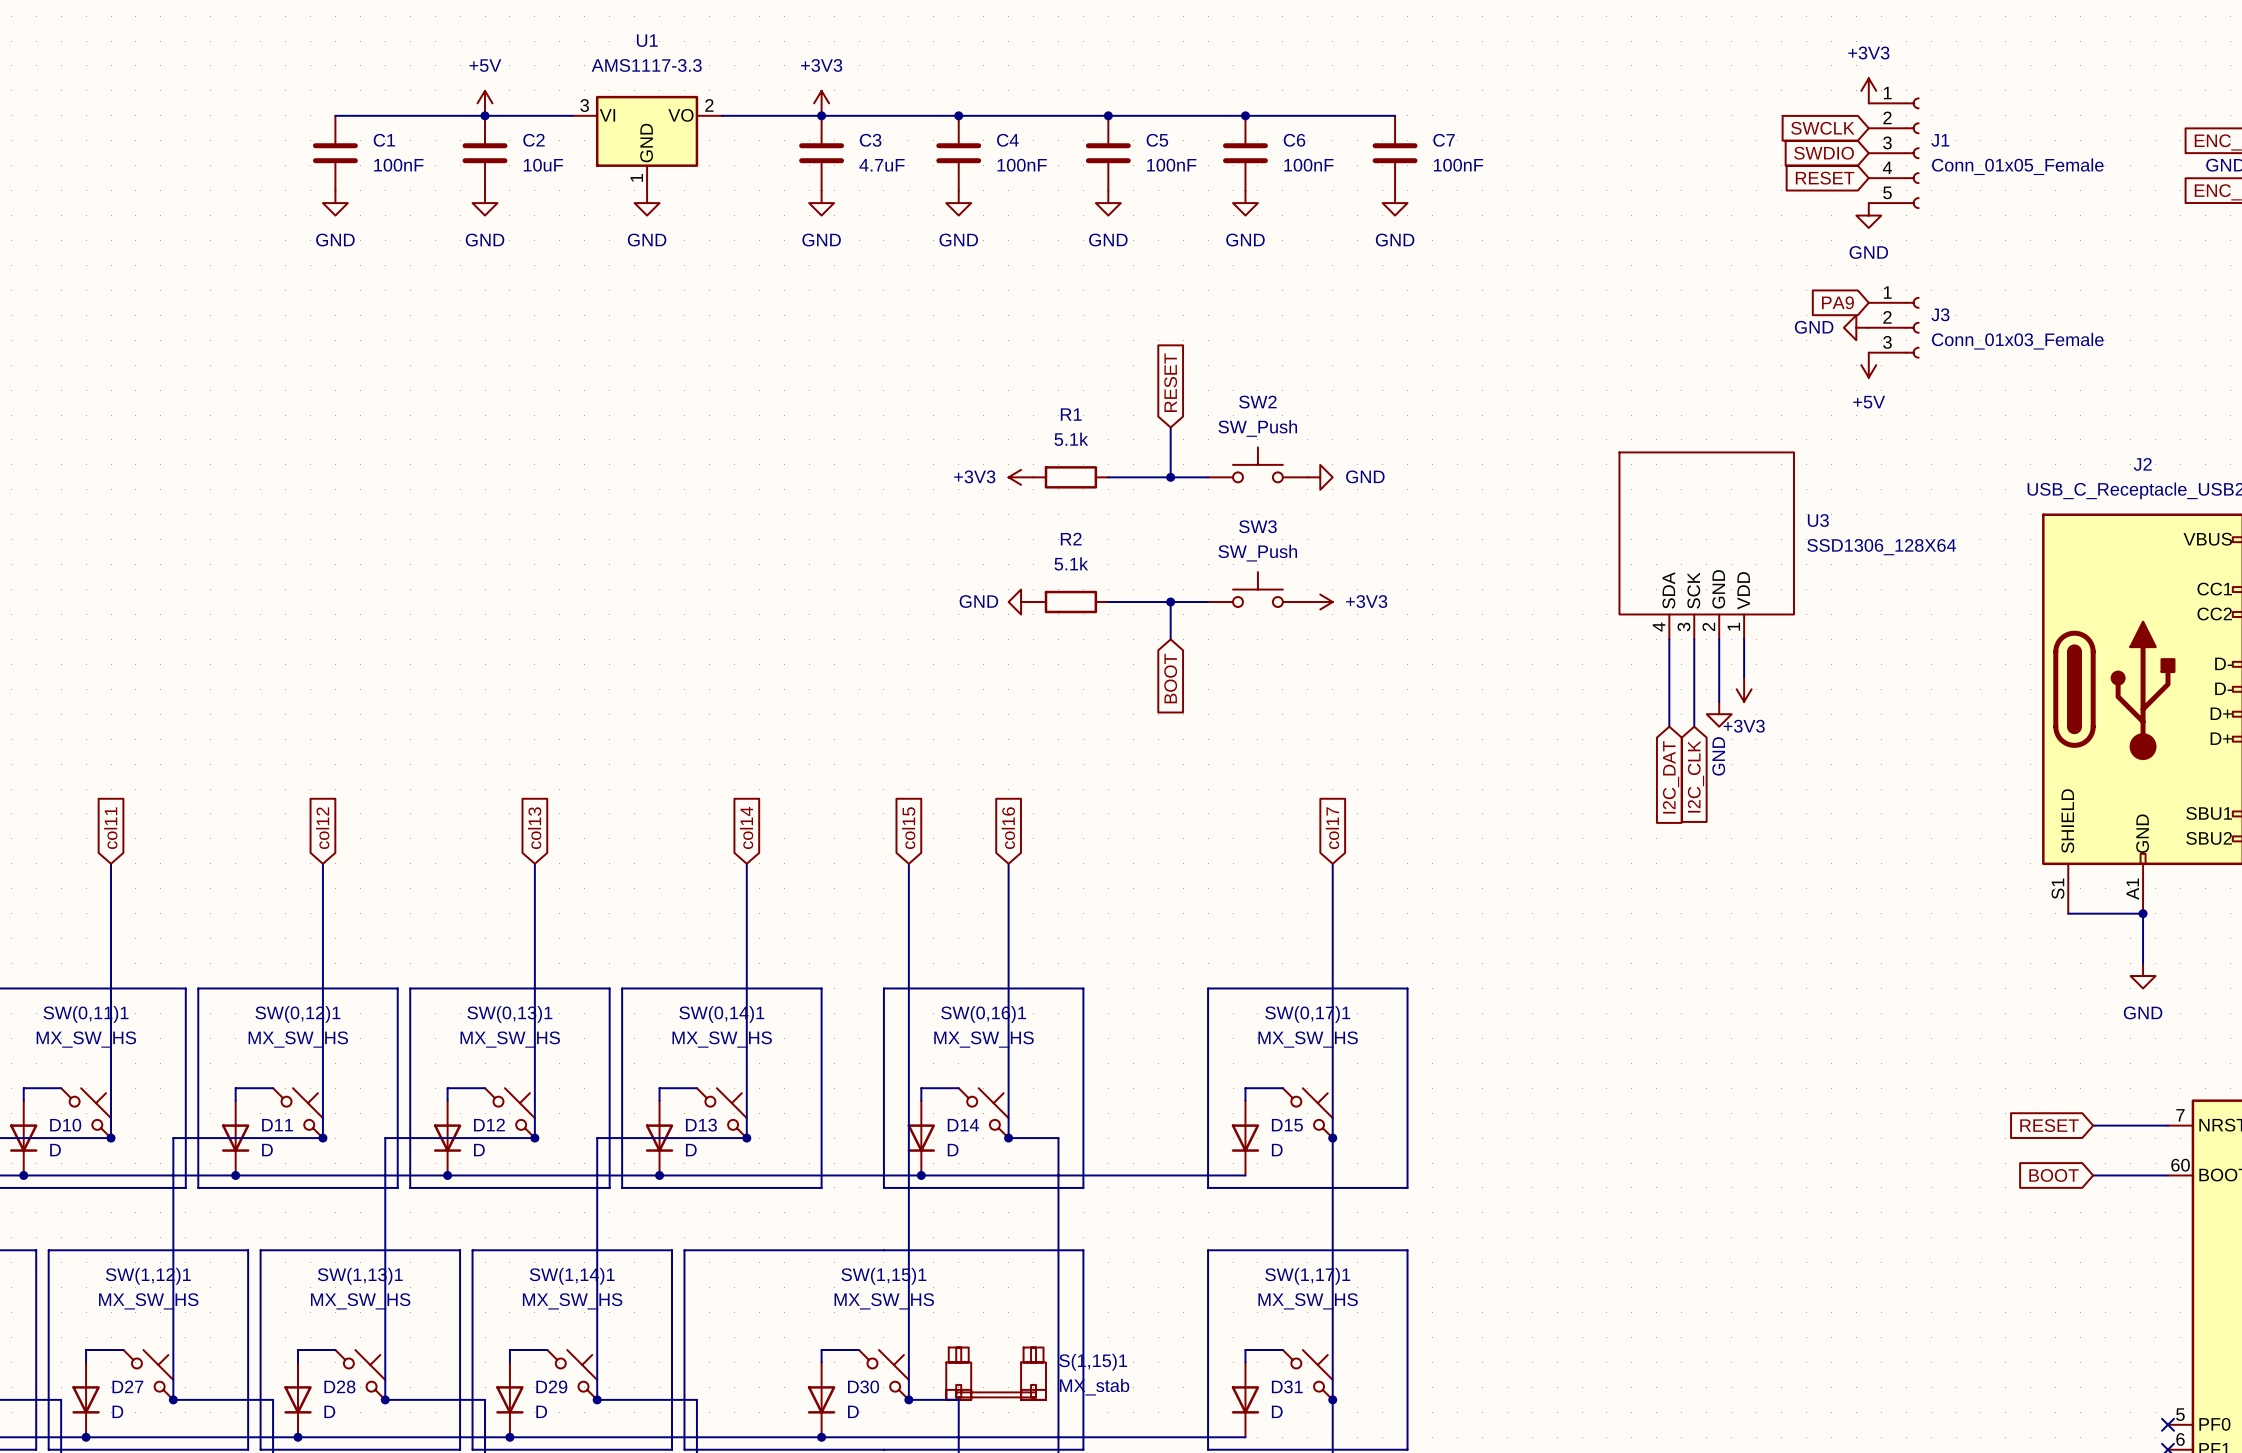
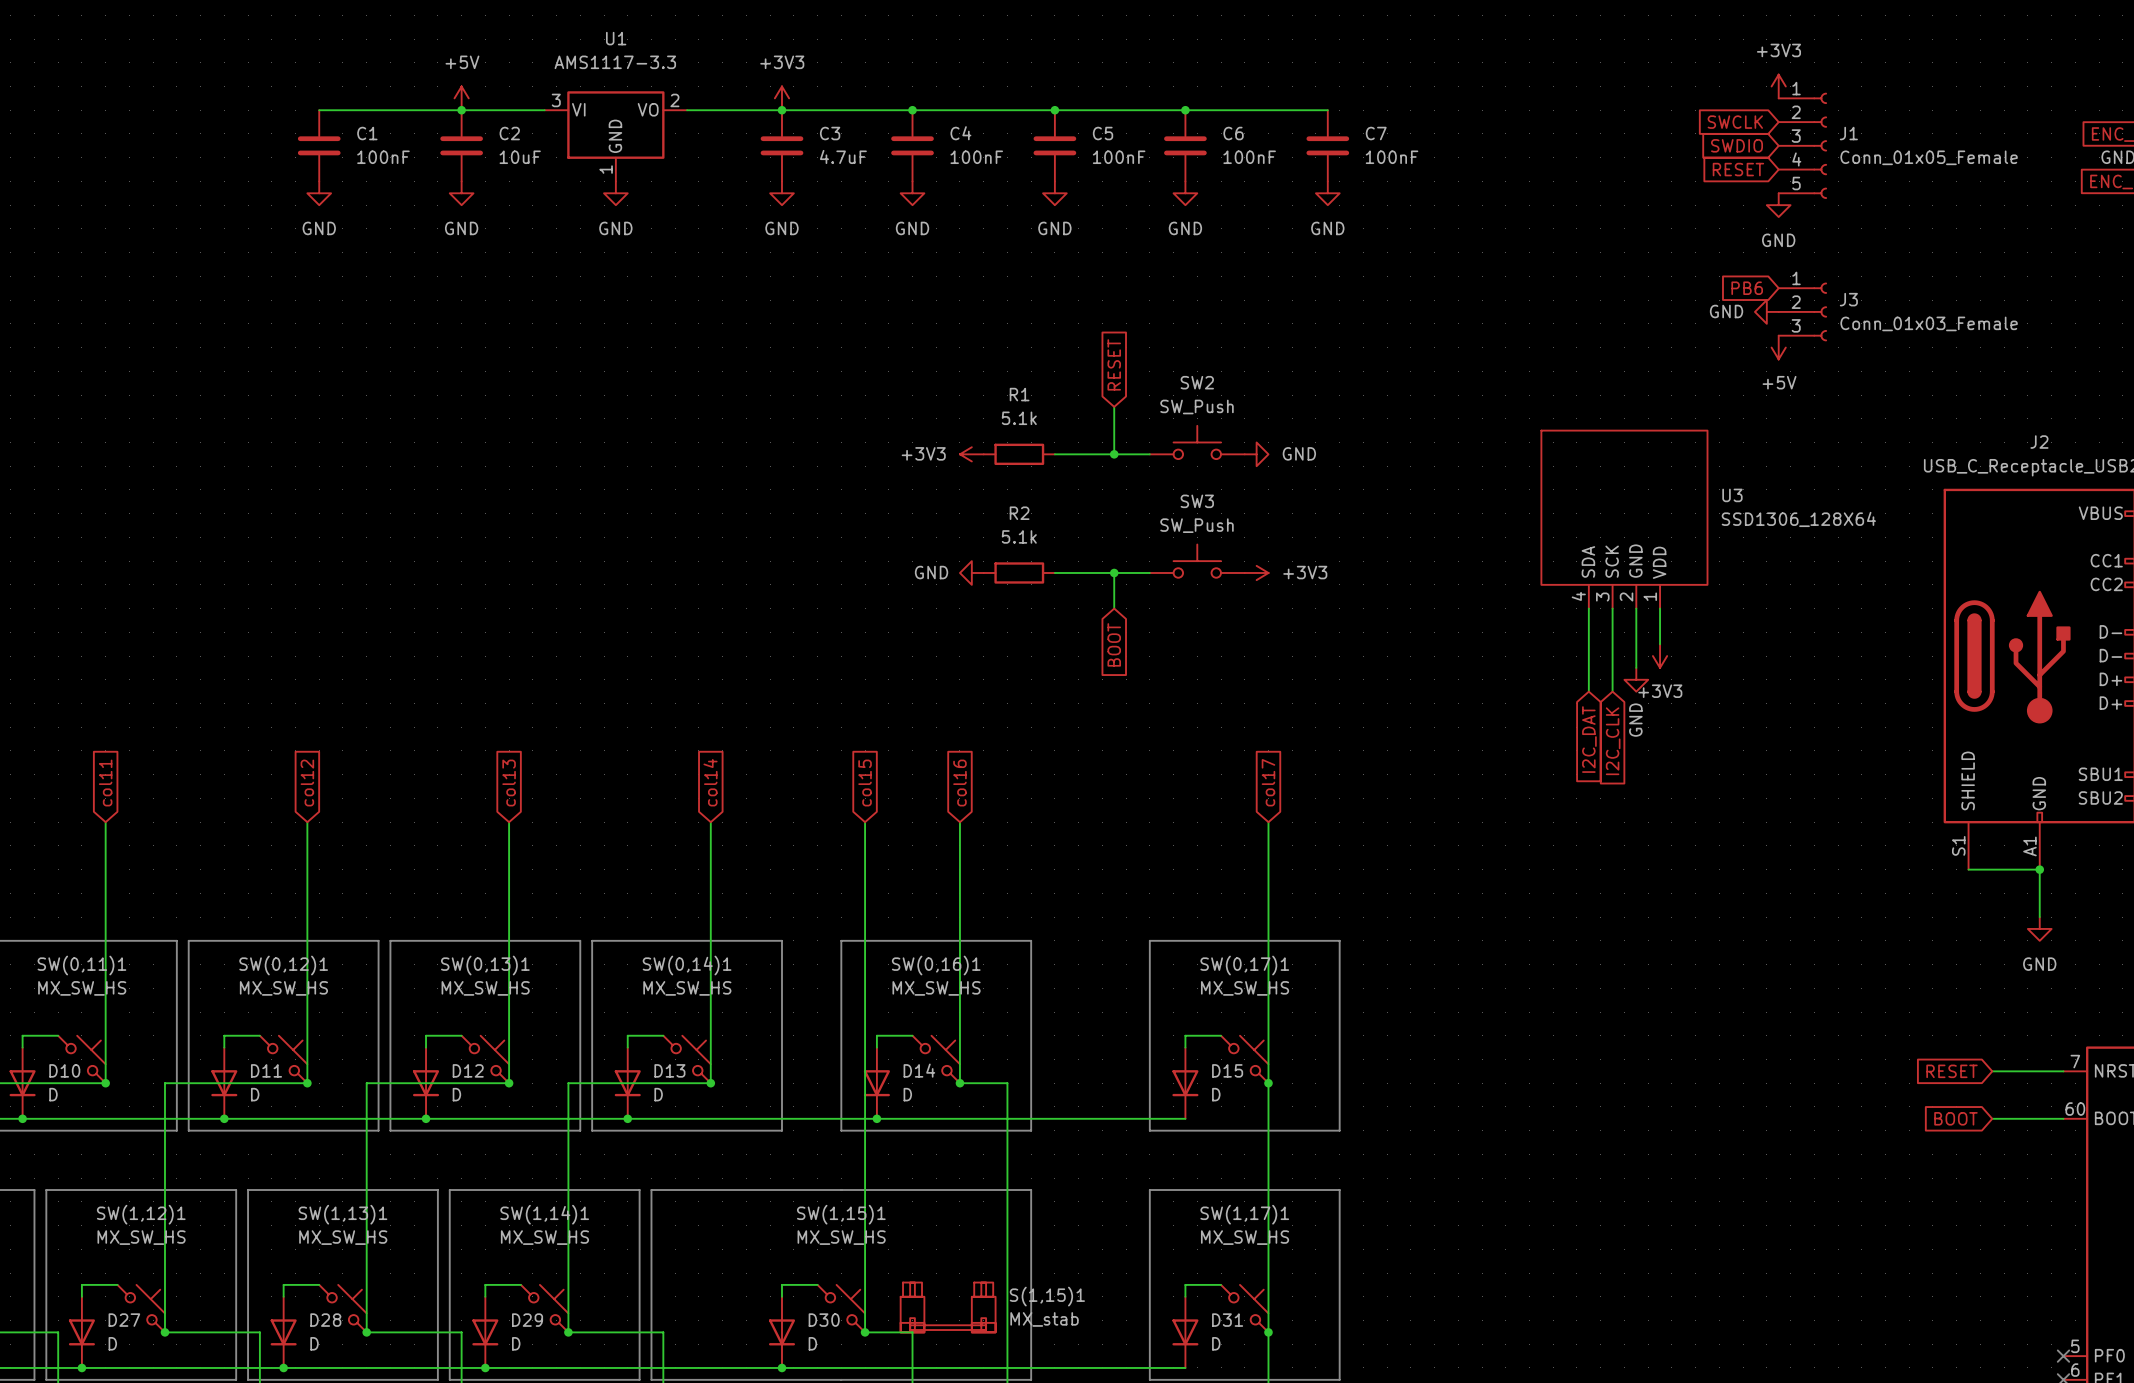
global label: PA9 (1837, 302) -> PB6 (1747, 288)

